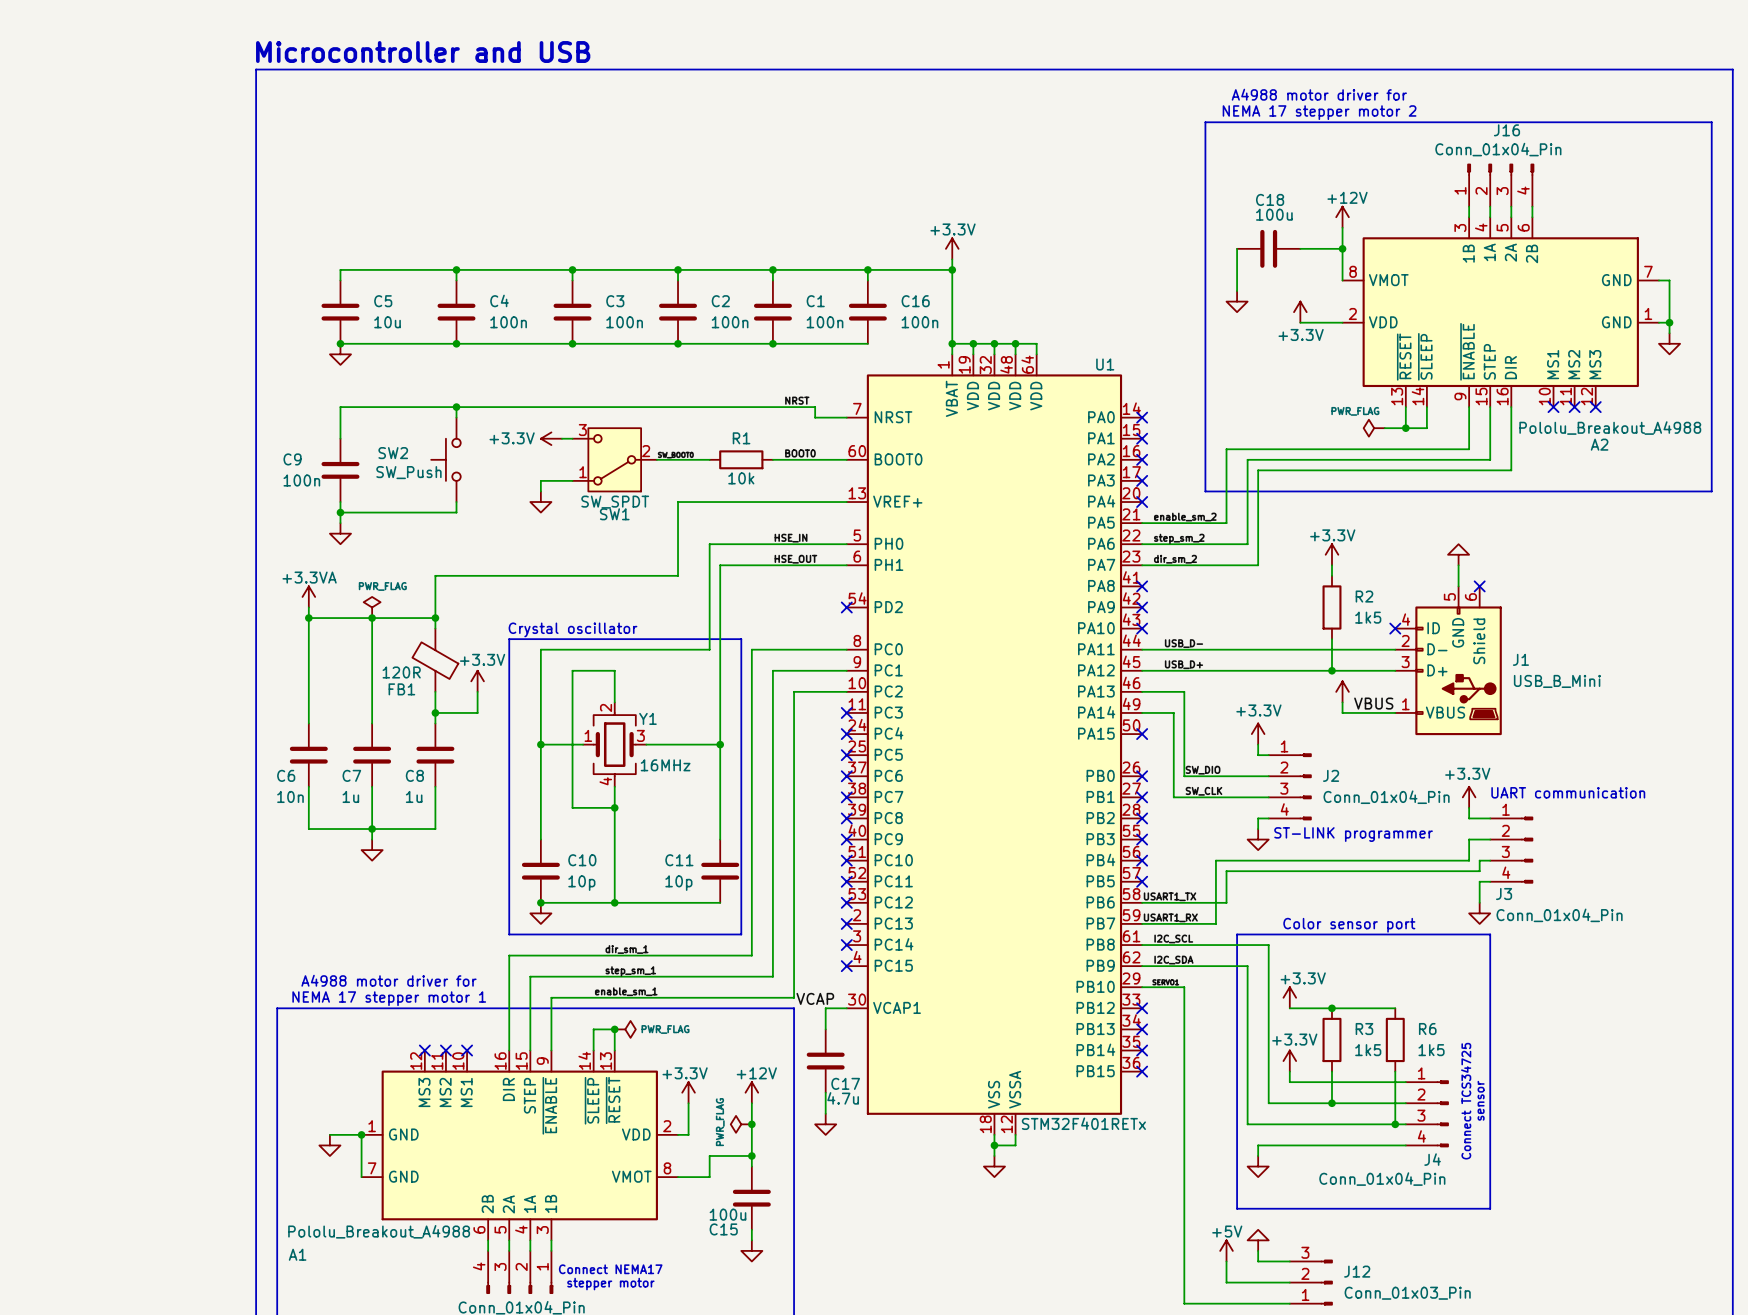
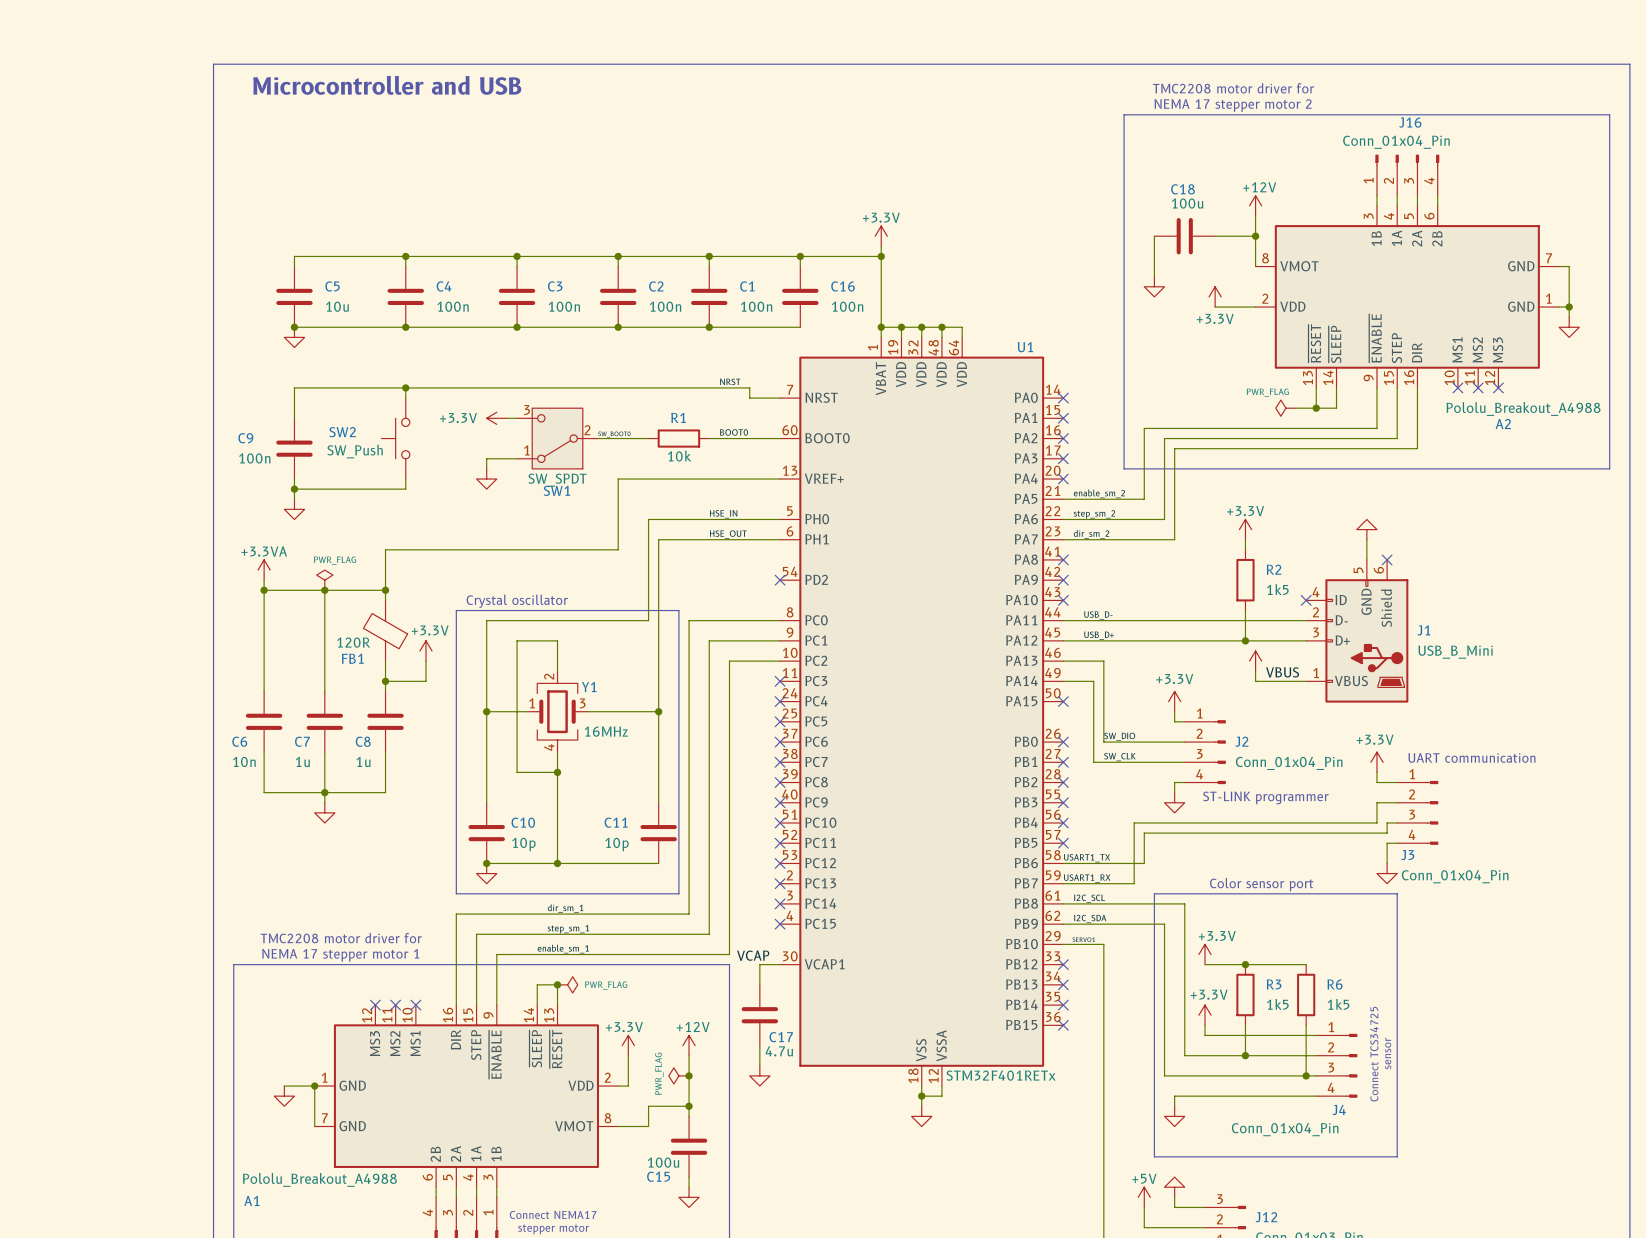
text position: Microcontroller and USB (423, 52) -> Microcontroller and USB (387, 85)
text: A4988 motor driver for (1319, 94) -> TMC2208 motor driver for (1233, 88)
text: A4988 motor driver for (388, 980) -> TMC2208 motor driver for (341, 938)

